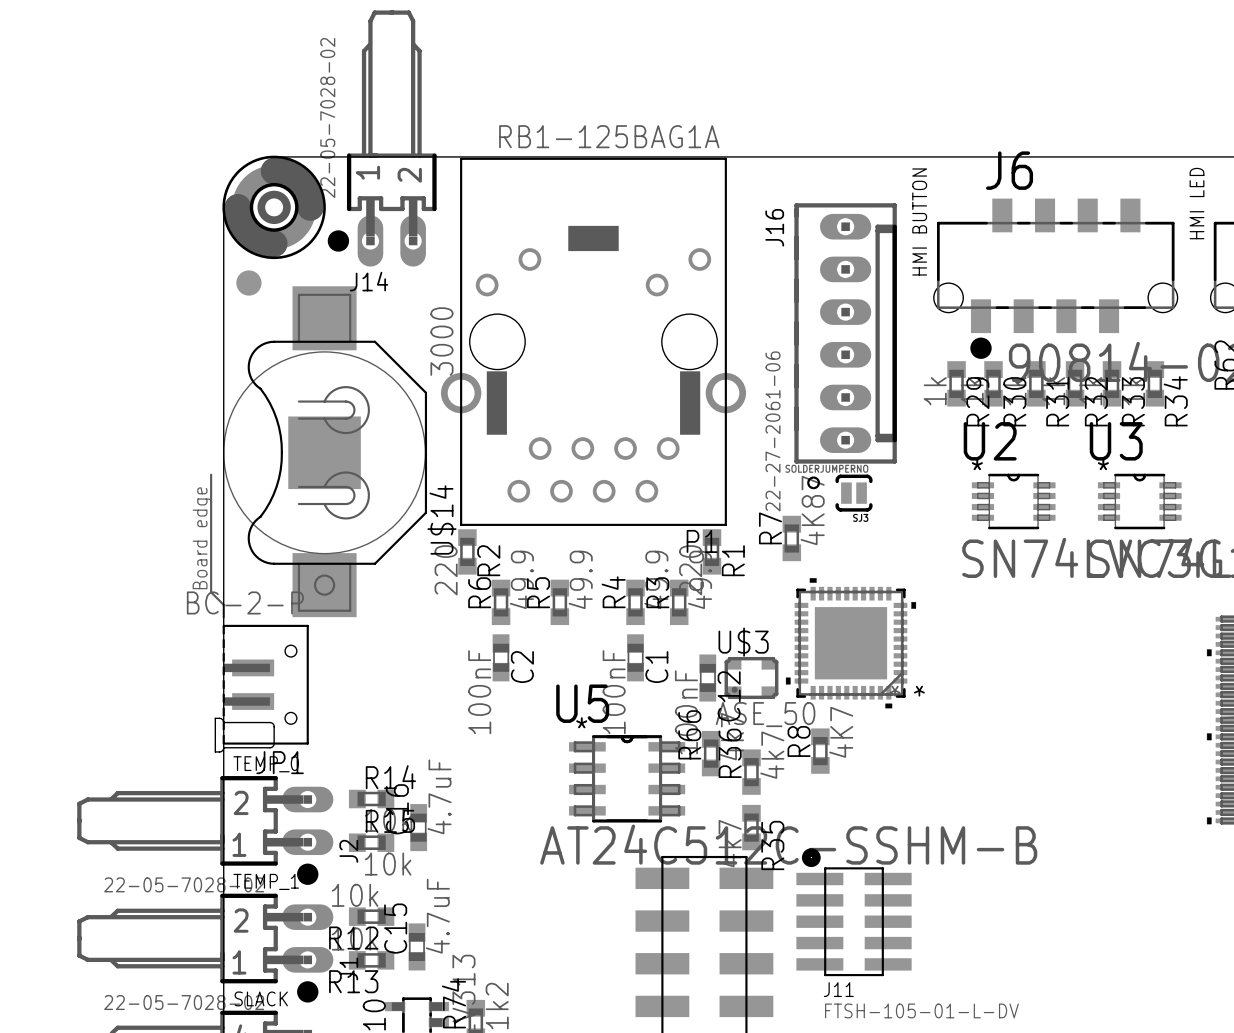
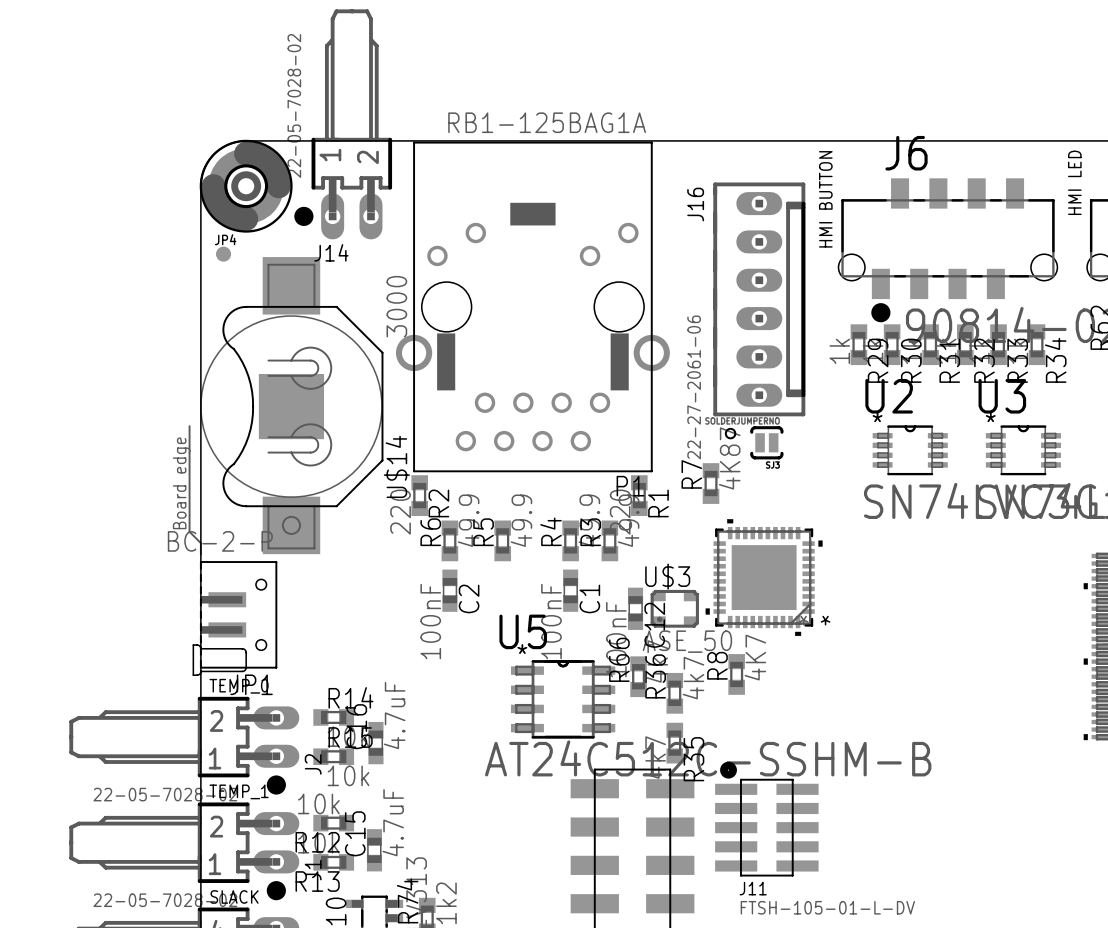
part: (248, 283) -> none
JP4: none -> (223, 254)

